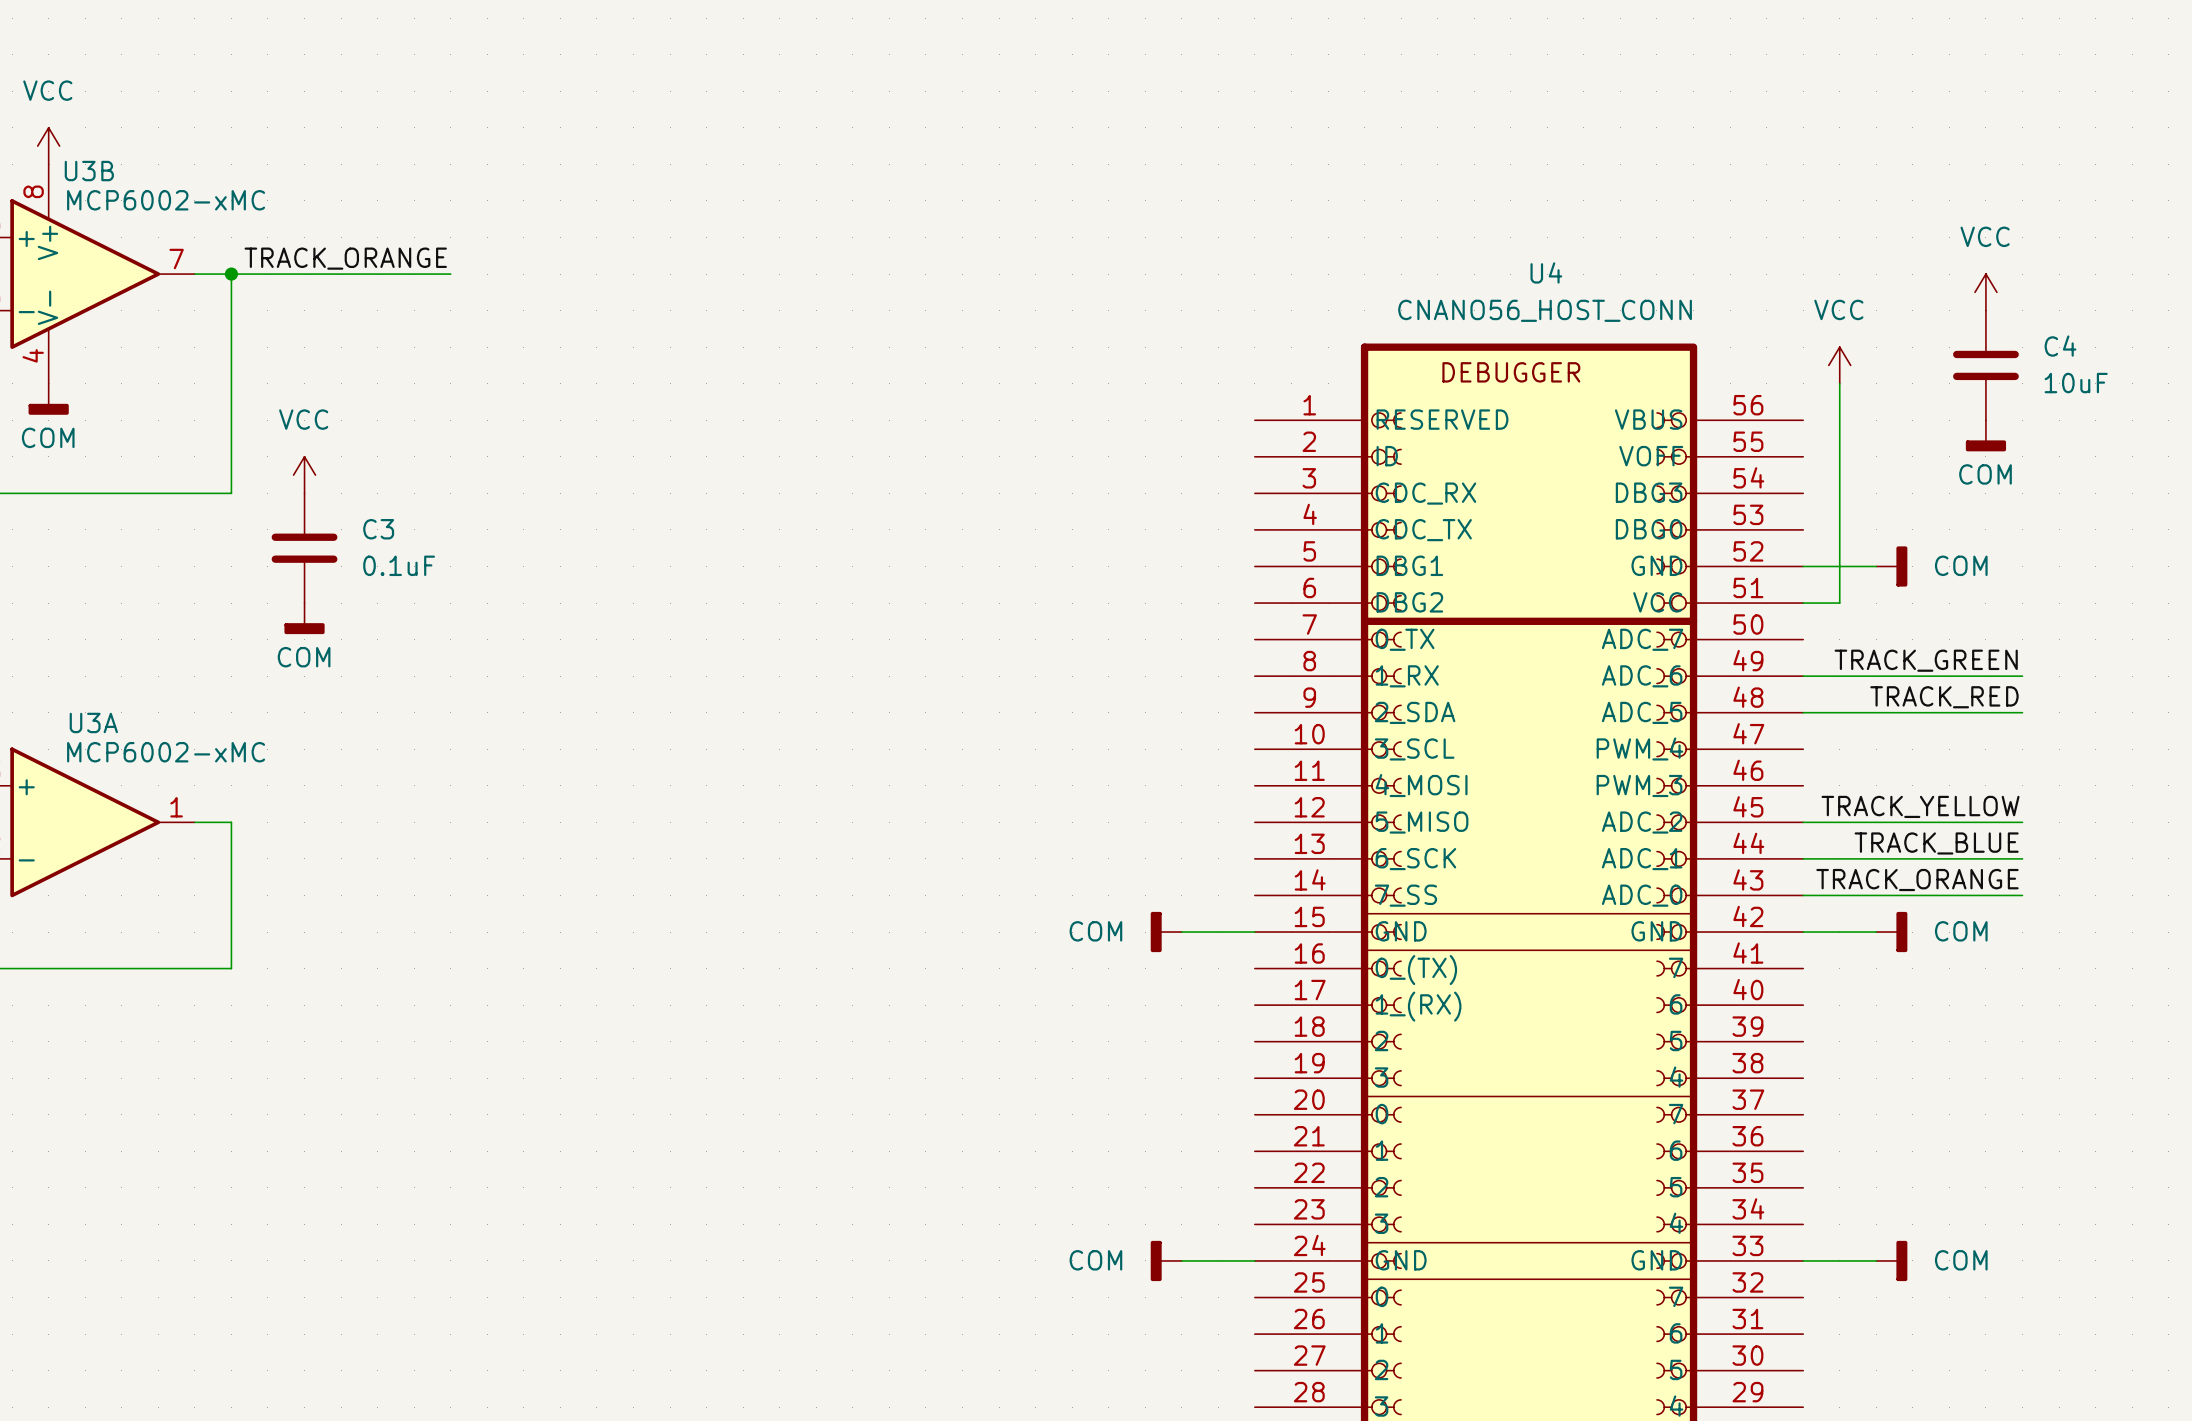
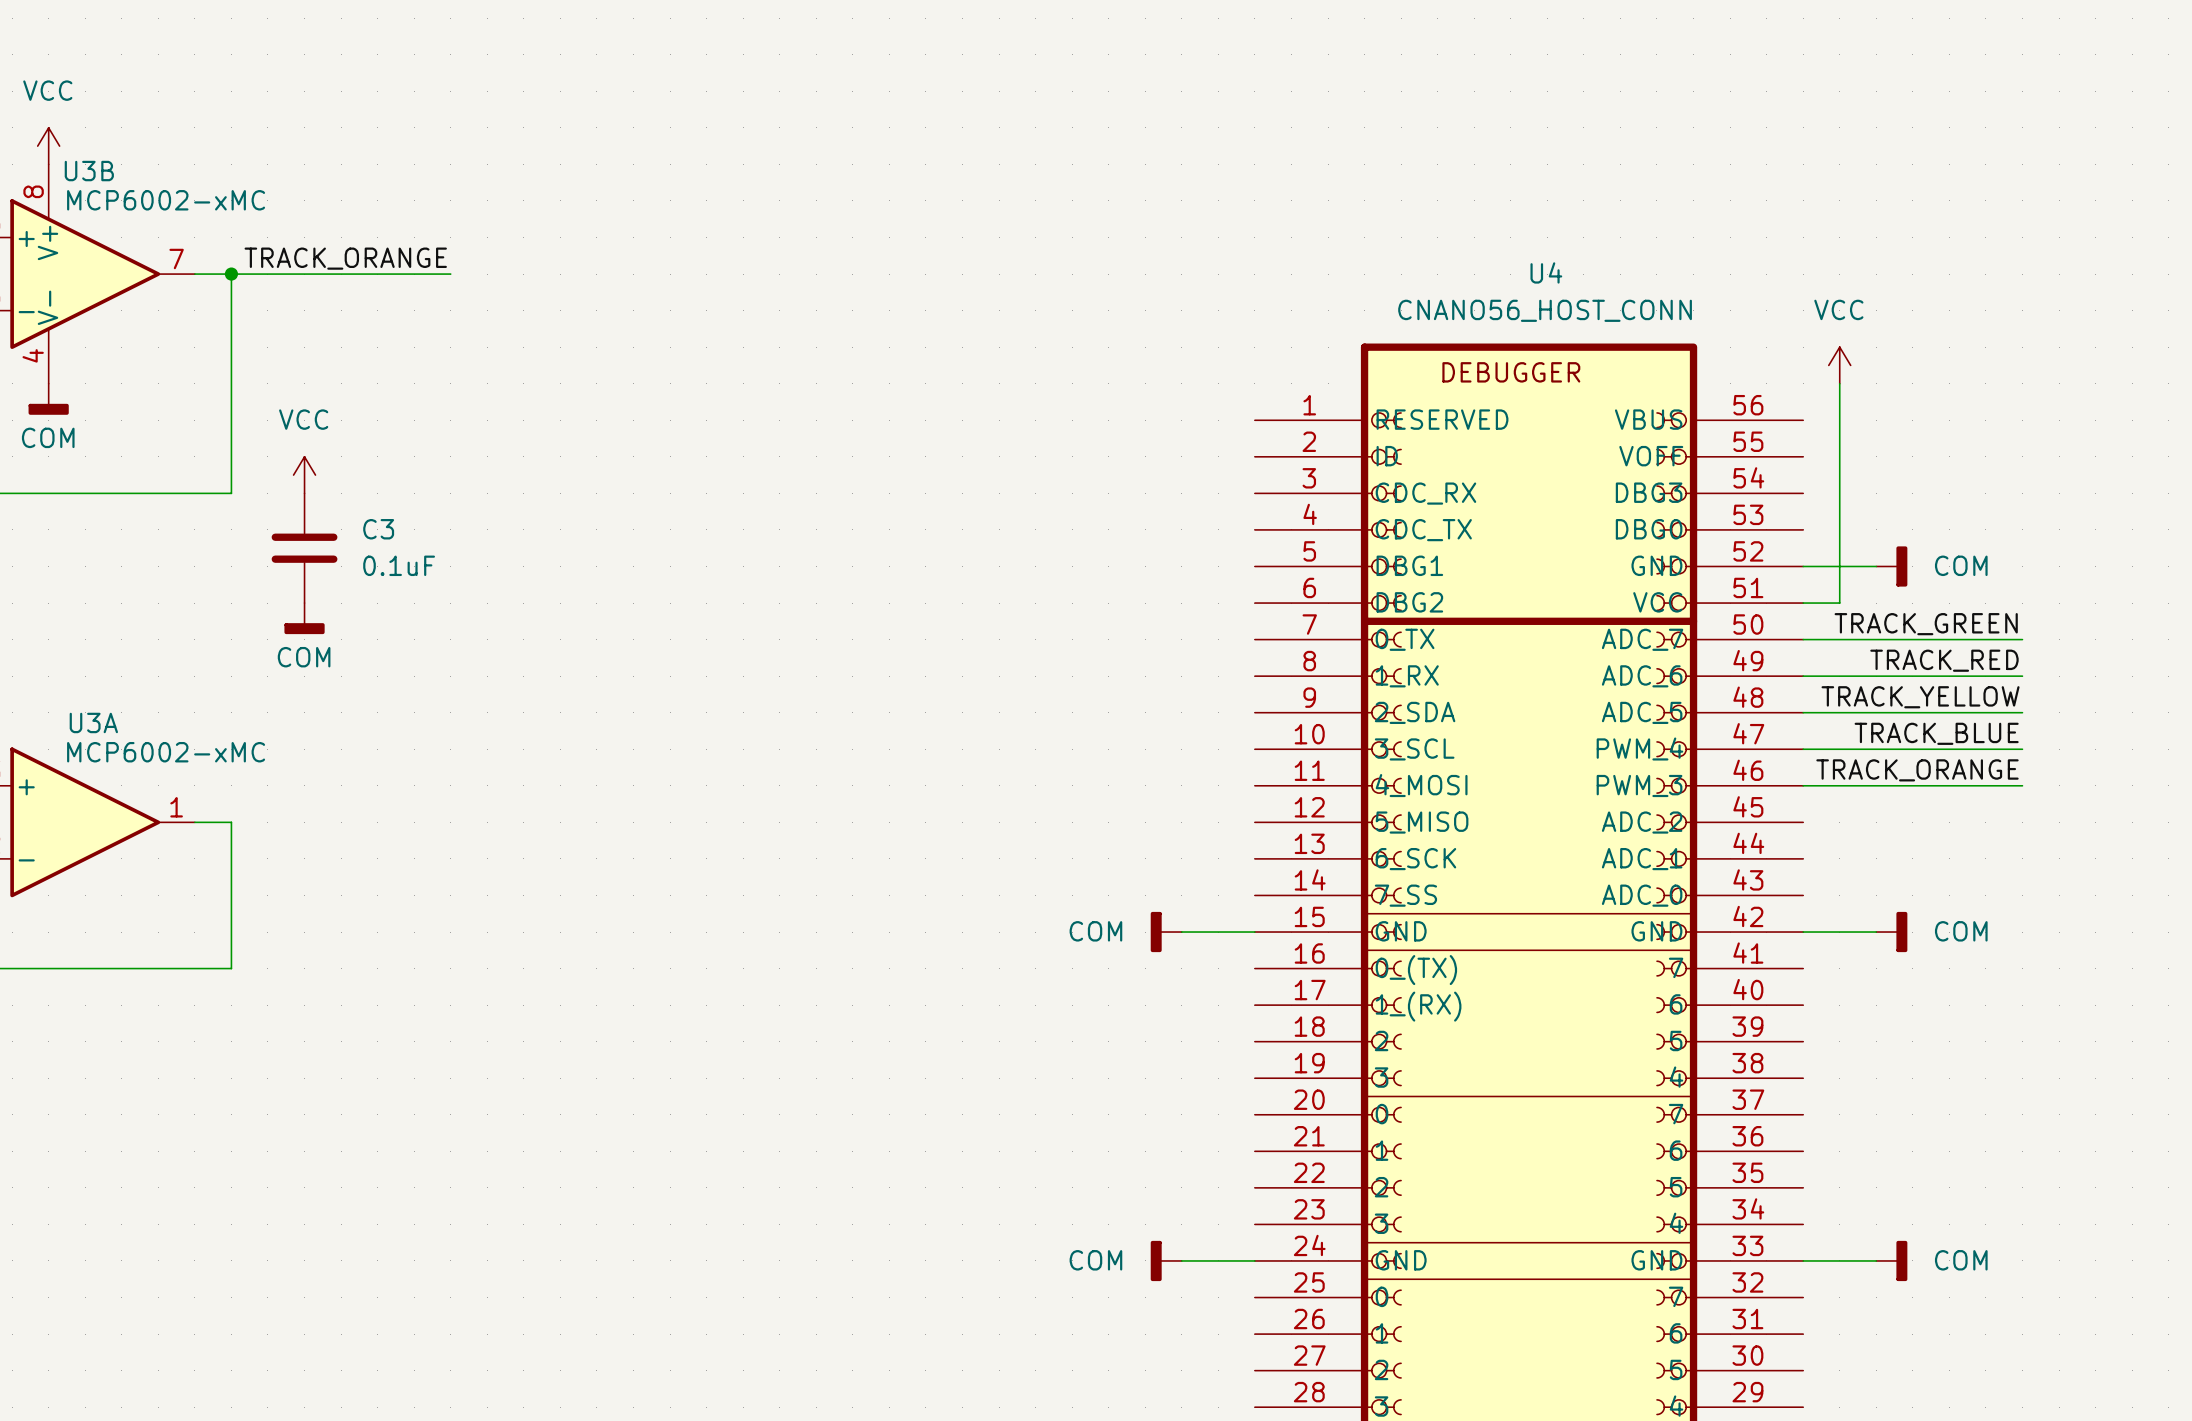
power symbol: VCC (1985, 292) -> none
C4: 10uF (1985, 365) -> none
power symbol: COM (1985, 435) -> none
label: none -> TRACK_GREEN (1926, 624)
label: TRACK_GREEN (1926, 660) -> TRACK_RED (1944, 660)
label: TRACK_RED (1944, 697) -> TRACK_YELLOW (1920, 697)
label: TRACK_YELLOW (1920, 806) -> none
wire: (1803, 822) (2022, 822) -> (1803, 785) (2022, 785)
label position: TRACK_BLUE (1936, 843) -> TRACK_BLUE (1936, 733)
wire: (1803, 858) (2022, 858) -> (1803, 749) (2022, 749)
label position: TRACK_ORANGE (1917, 880) -> TRACK_ORANGE (1917, 770)
wire: (1803, 895) (2022, 895) -> (1803, 639) (2022, 639)

